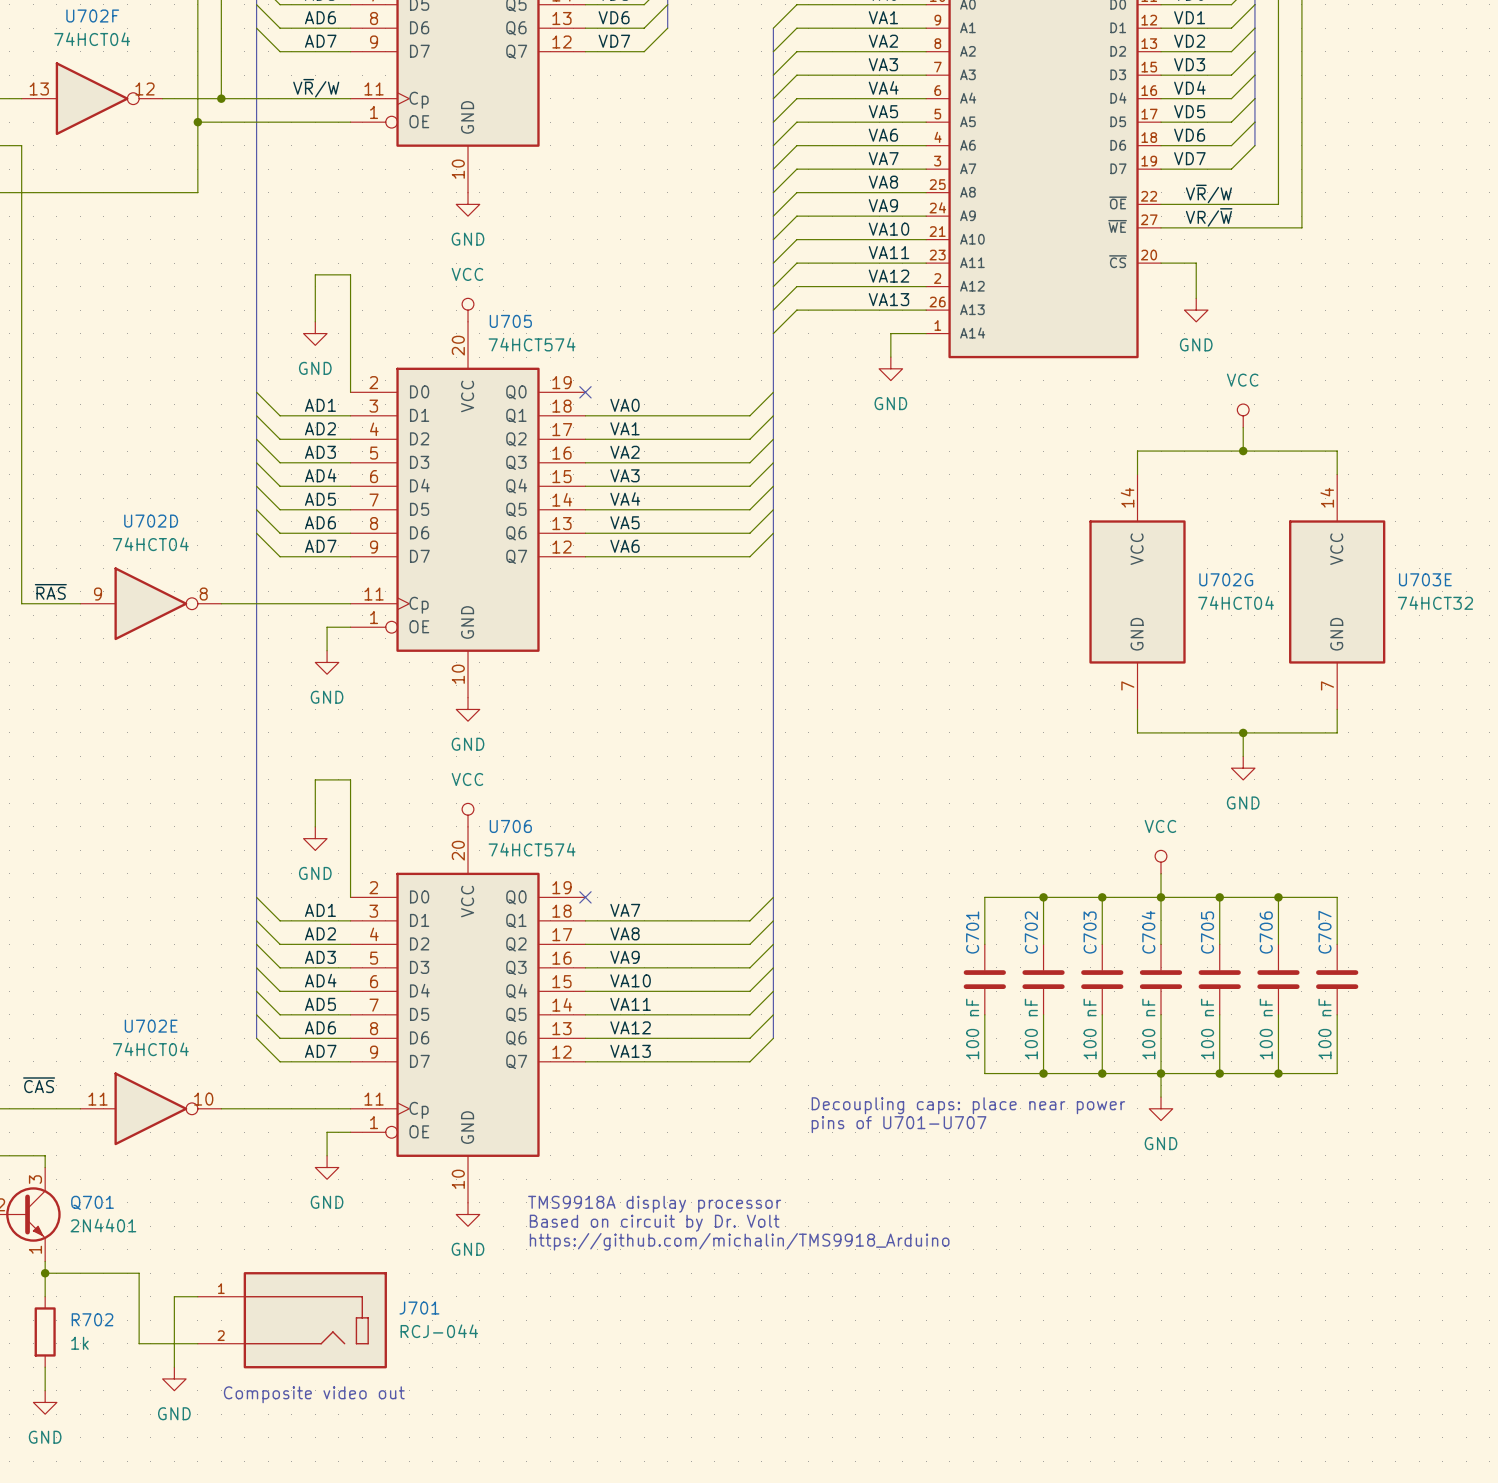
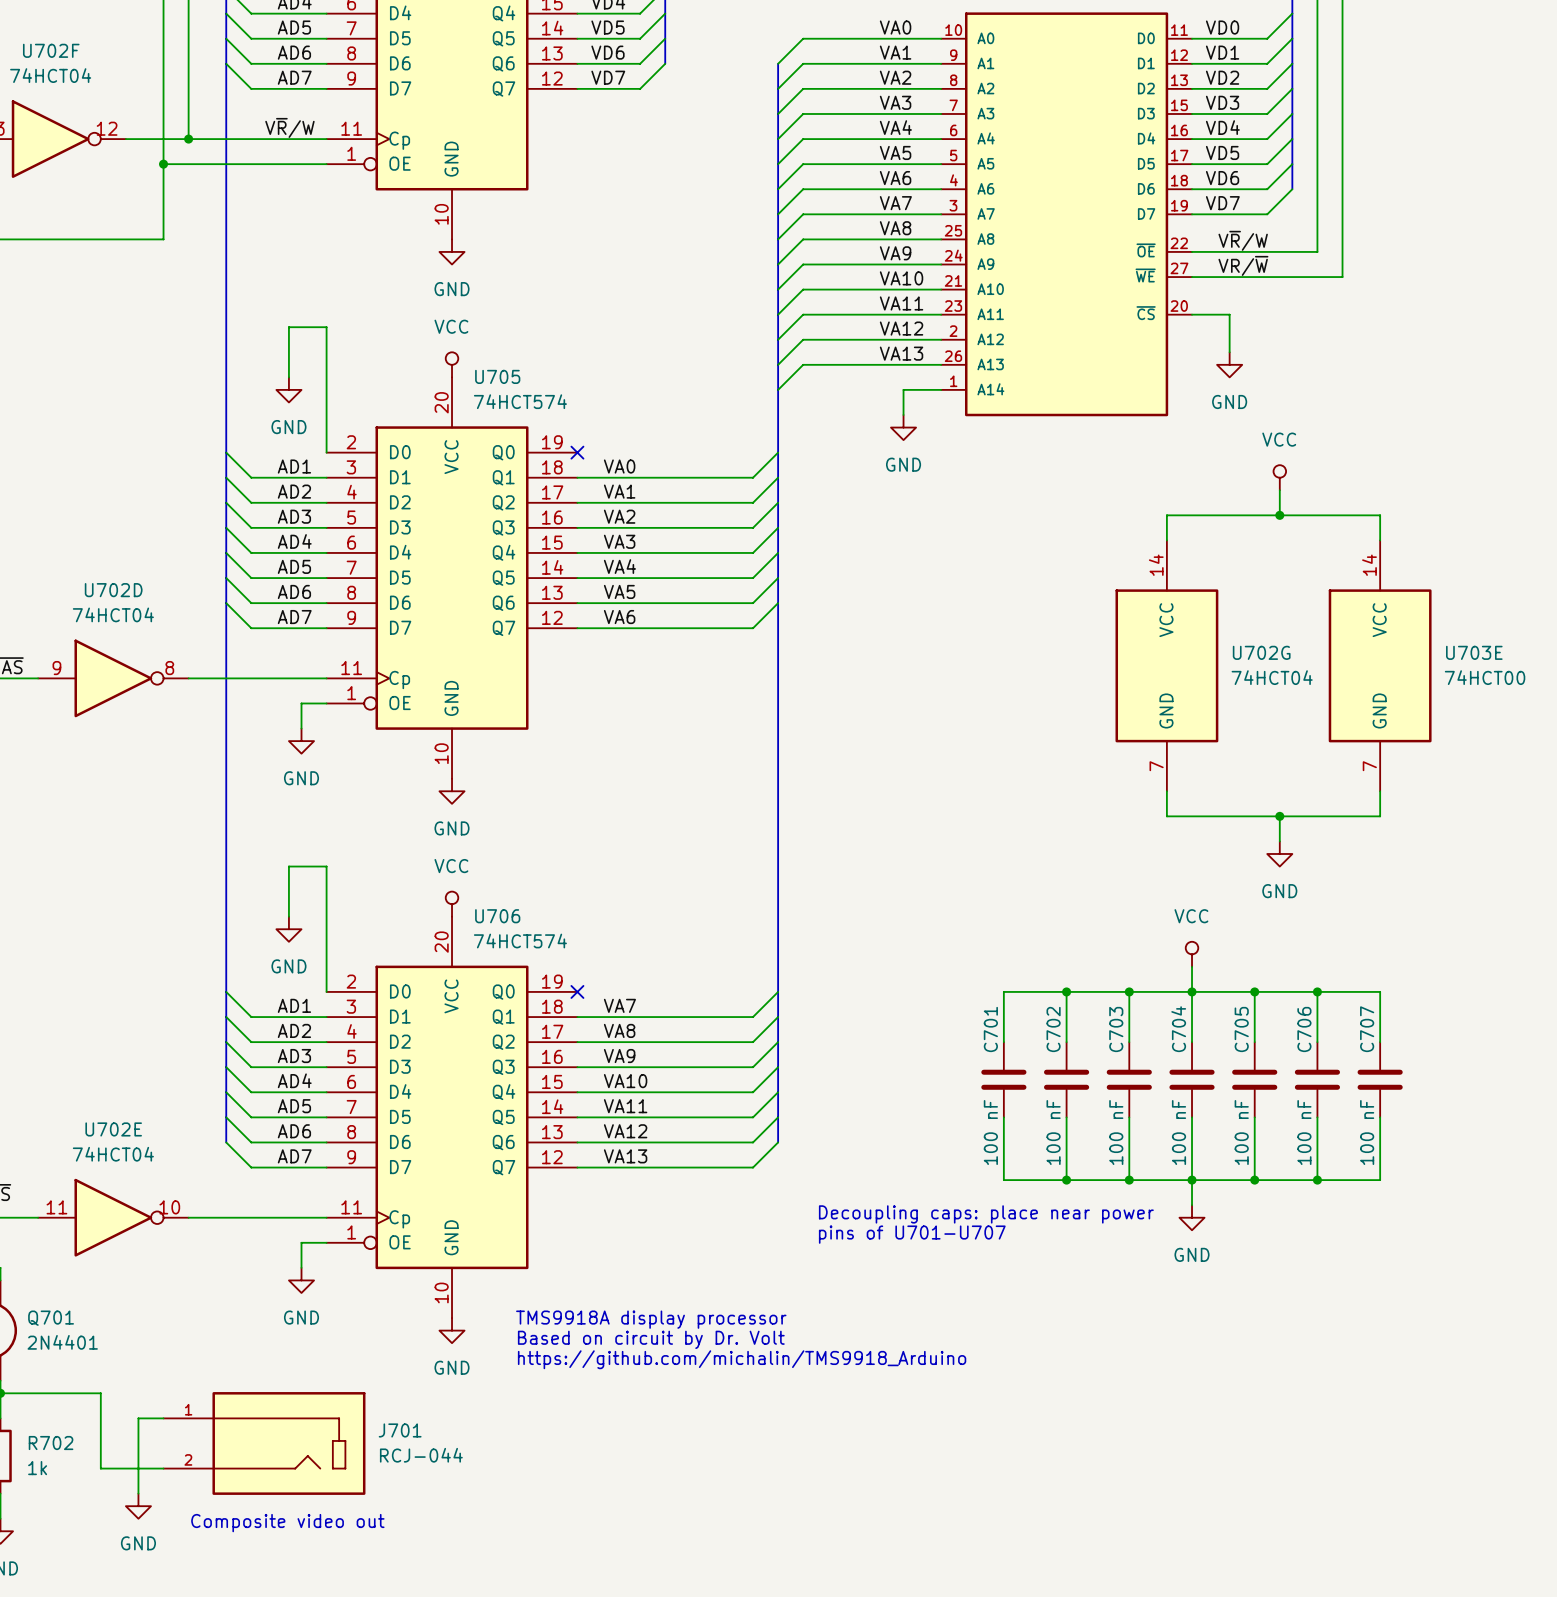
U703E value: 74HCT32 (1435, 603) -> 74HCT00 (1485, 677)

